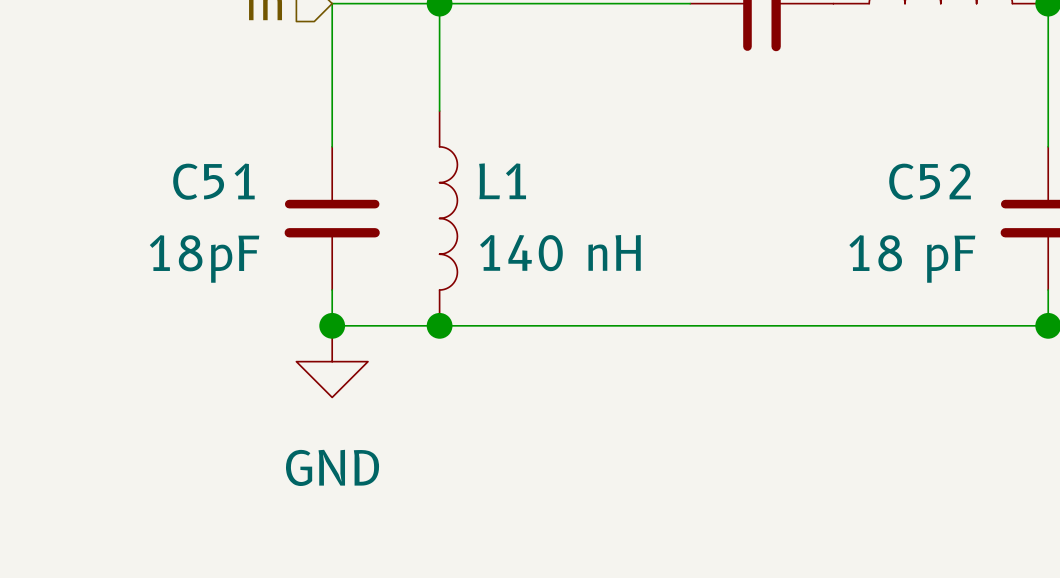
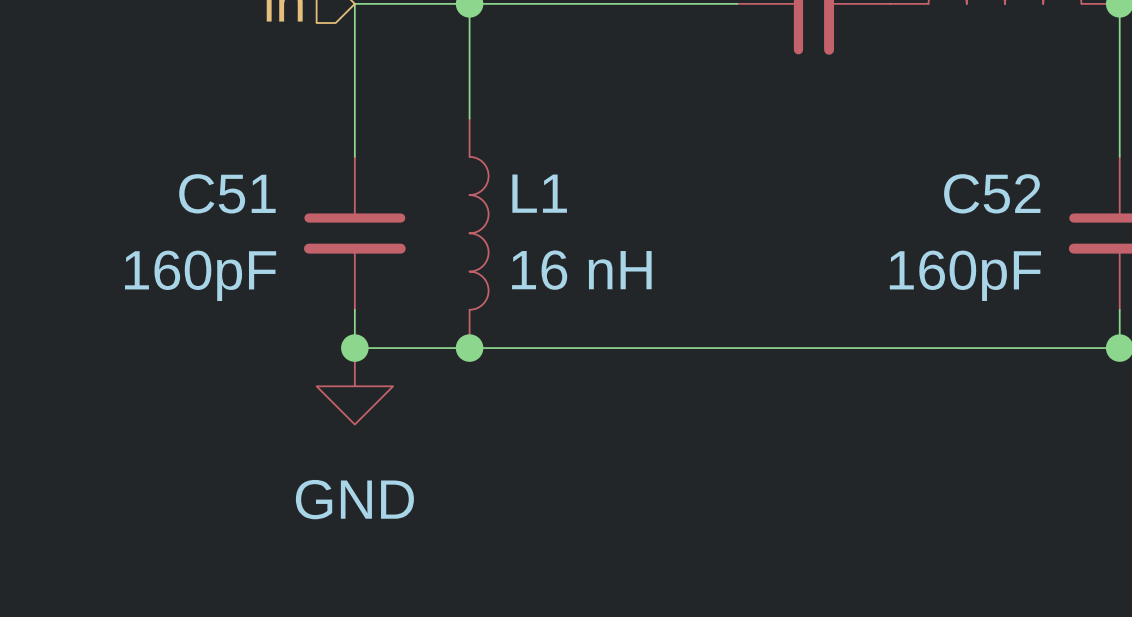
L1 value: 140 nH (560, 253) -> 16 nH (581, 270)
C51 value: 18pF (204, 258) -> 160pF (200, 275)
C52 value: 18 pF (912, 258) -> 160pF (965, 275)

